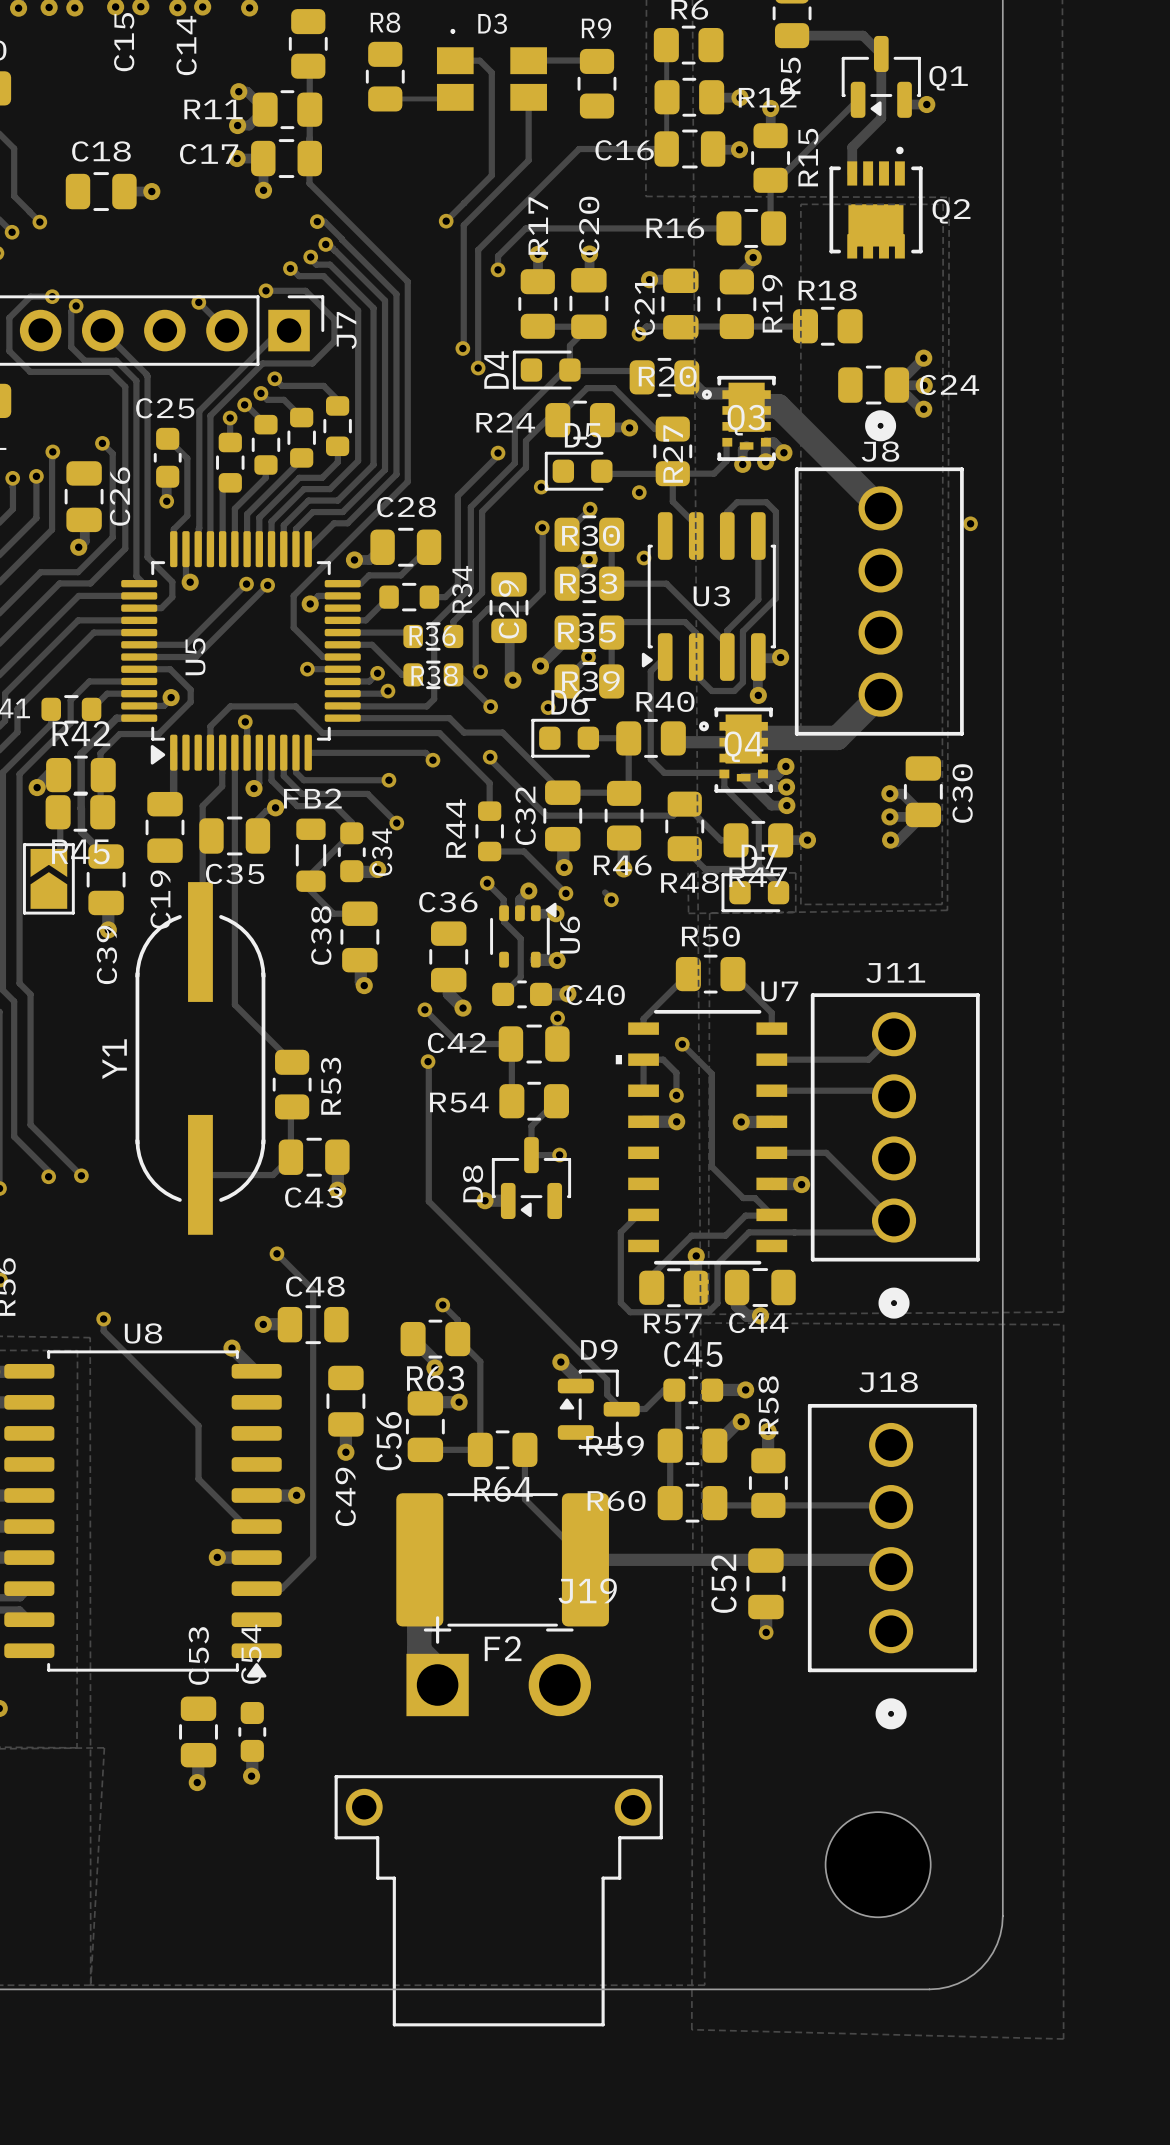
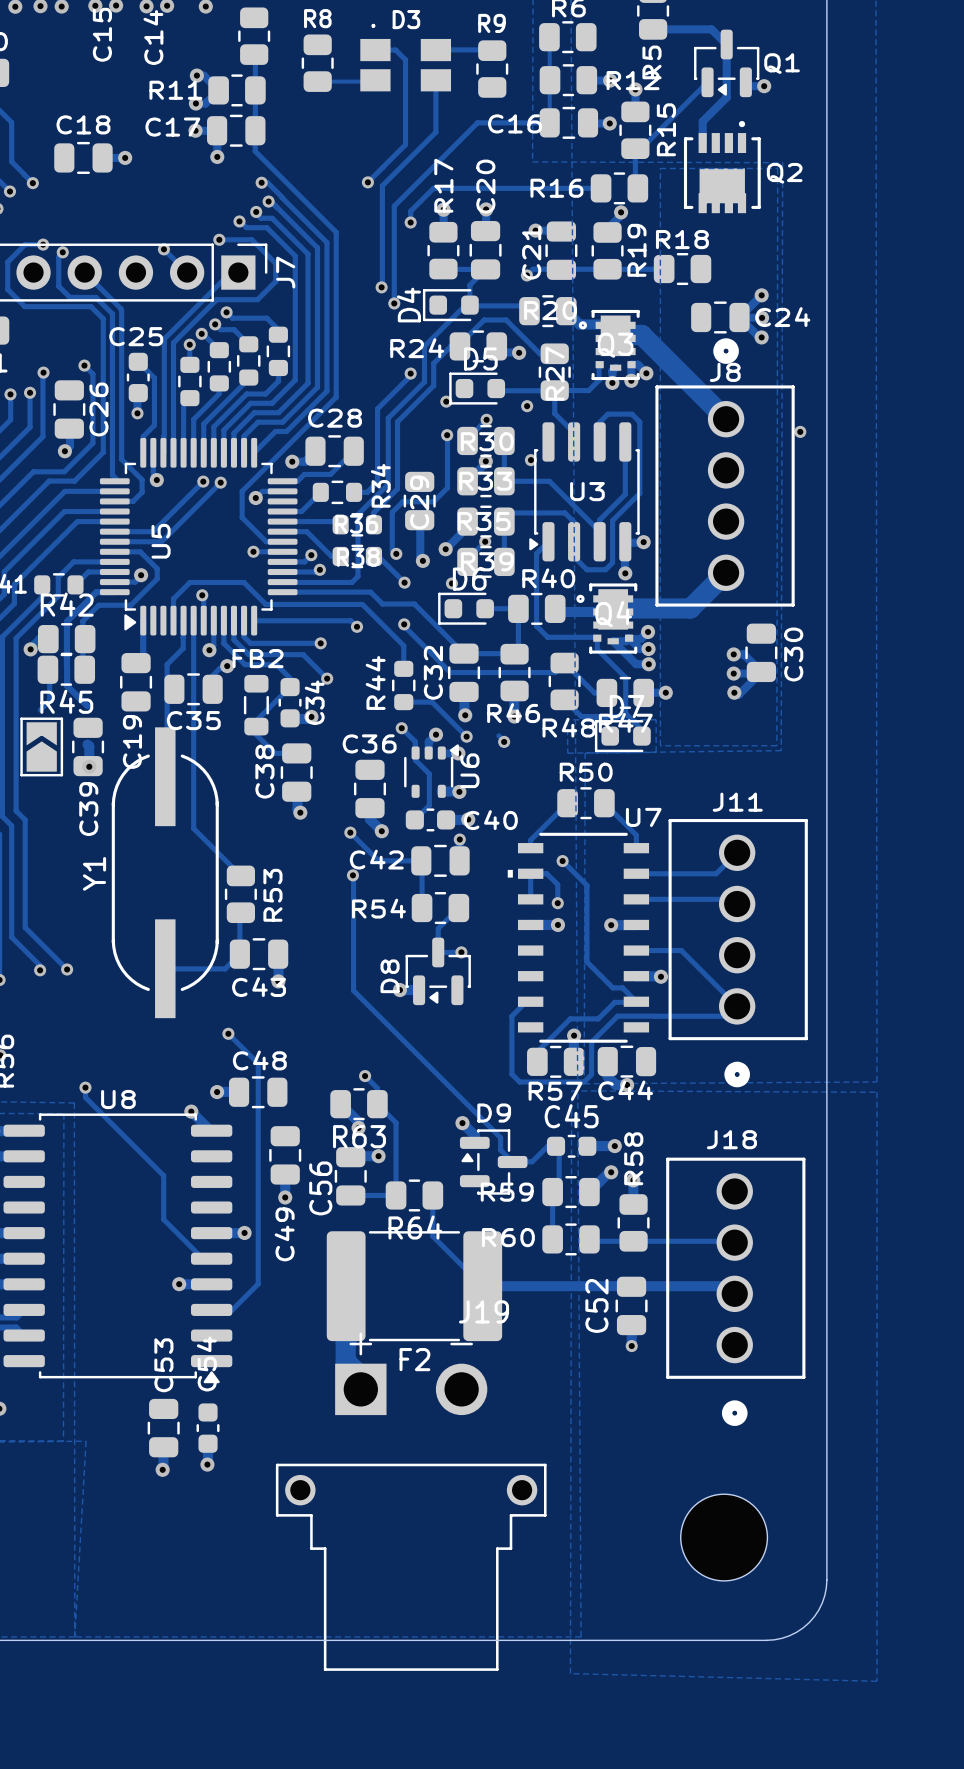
part position: (48, 878) -> (41, 746)
C39 position: (106, 879) -> (88, 746)

